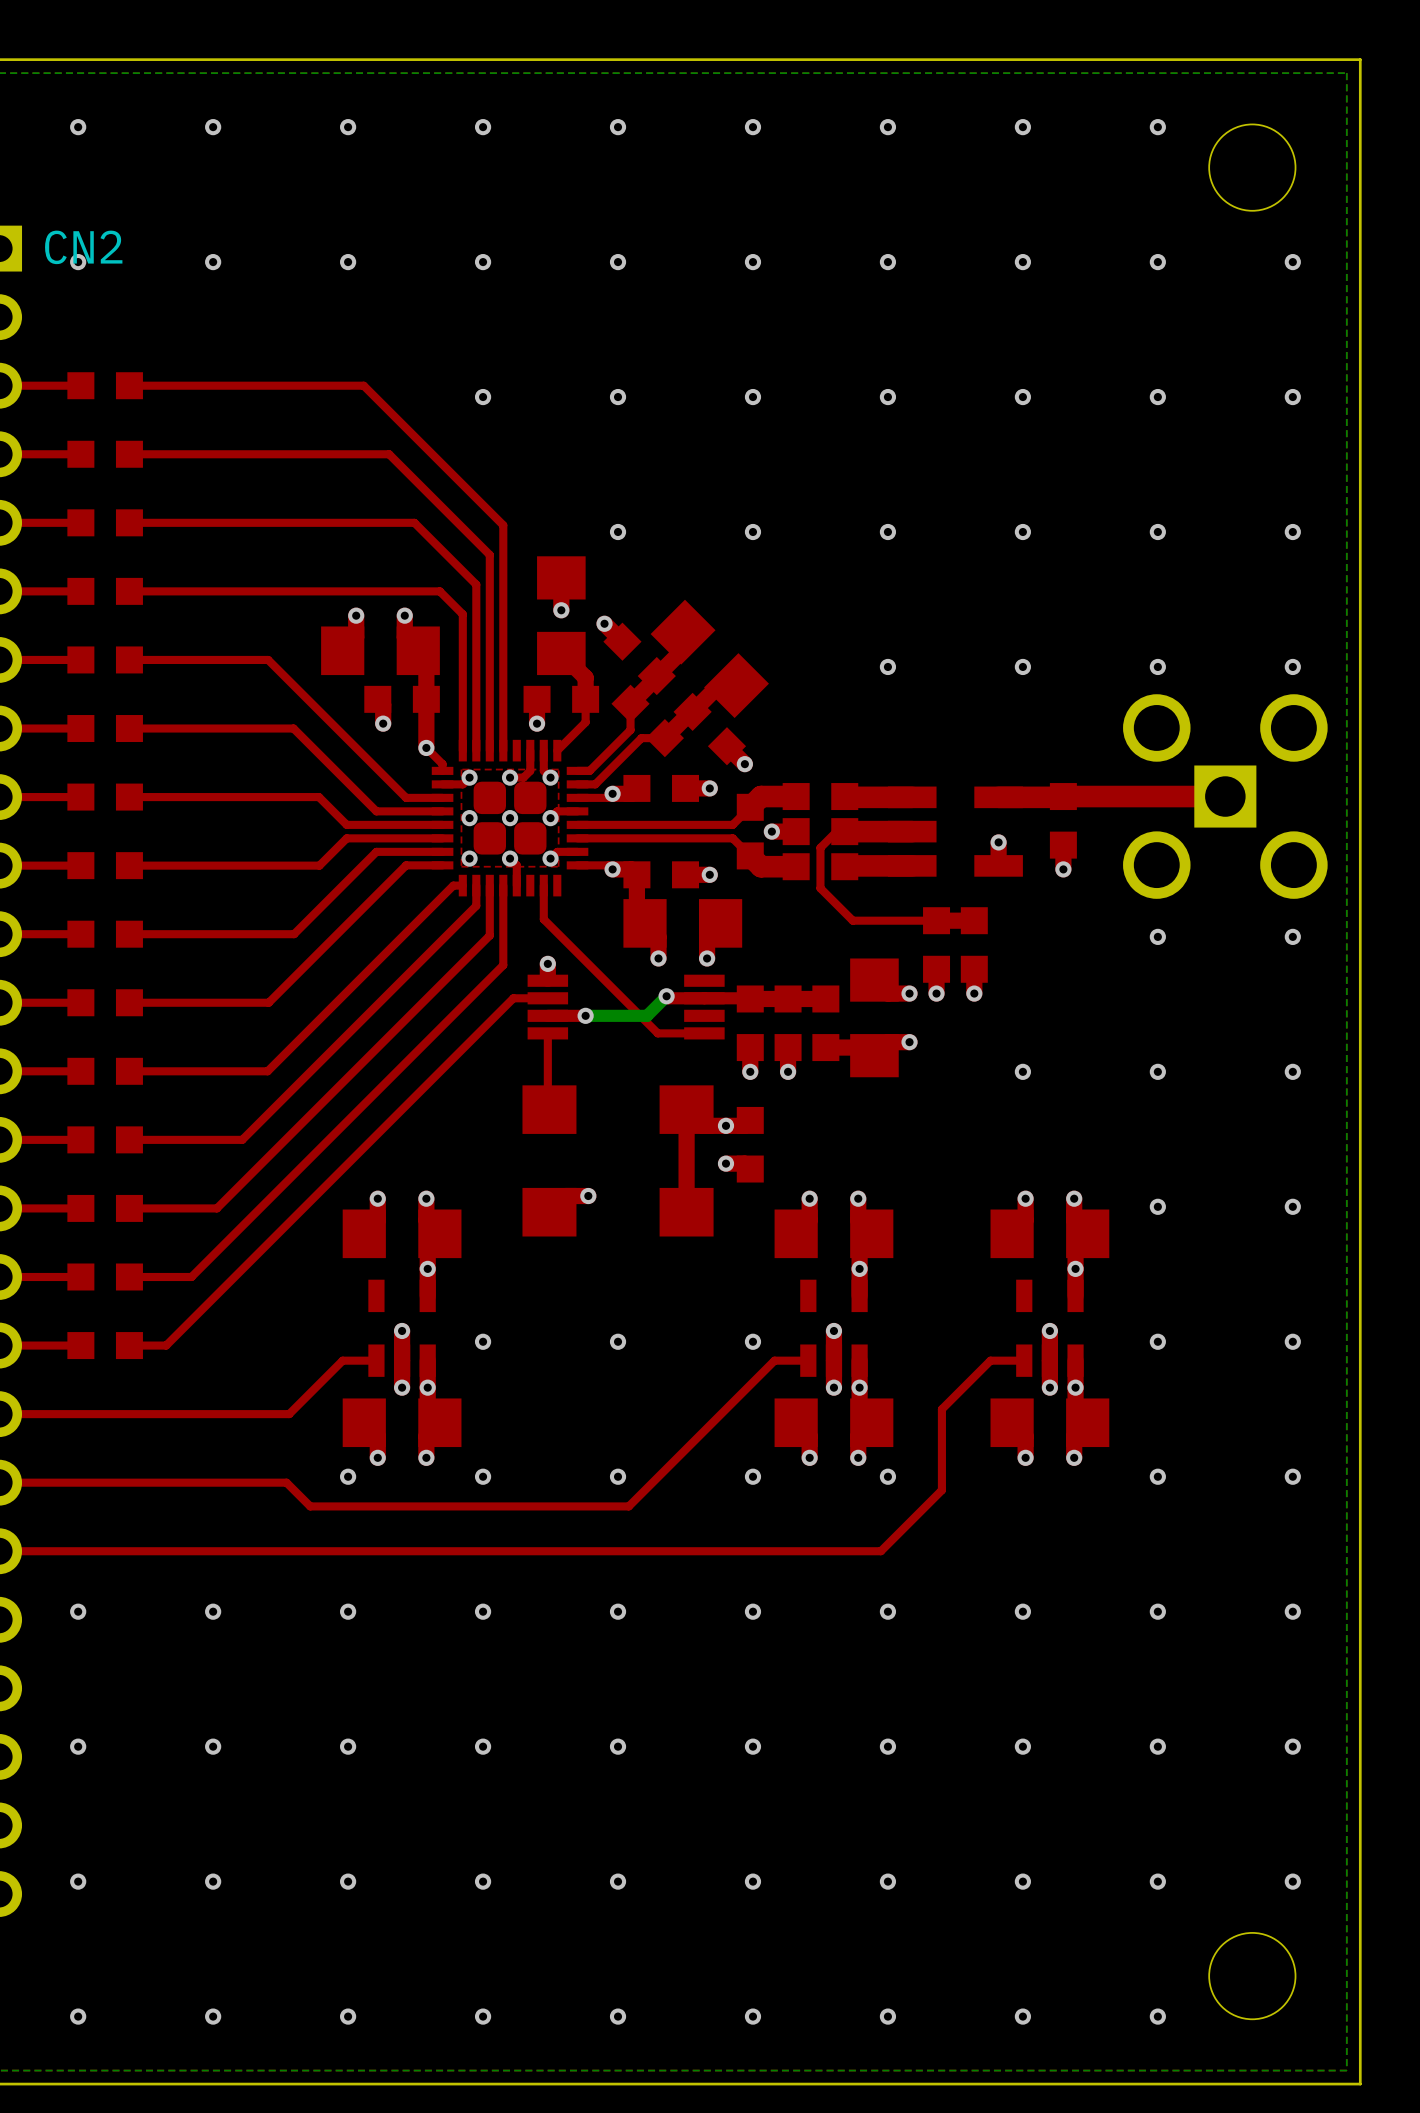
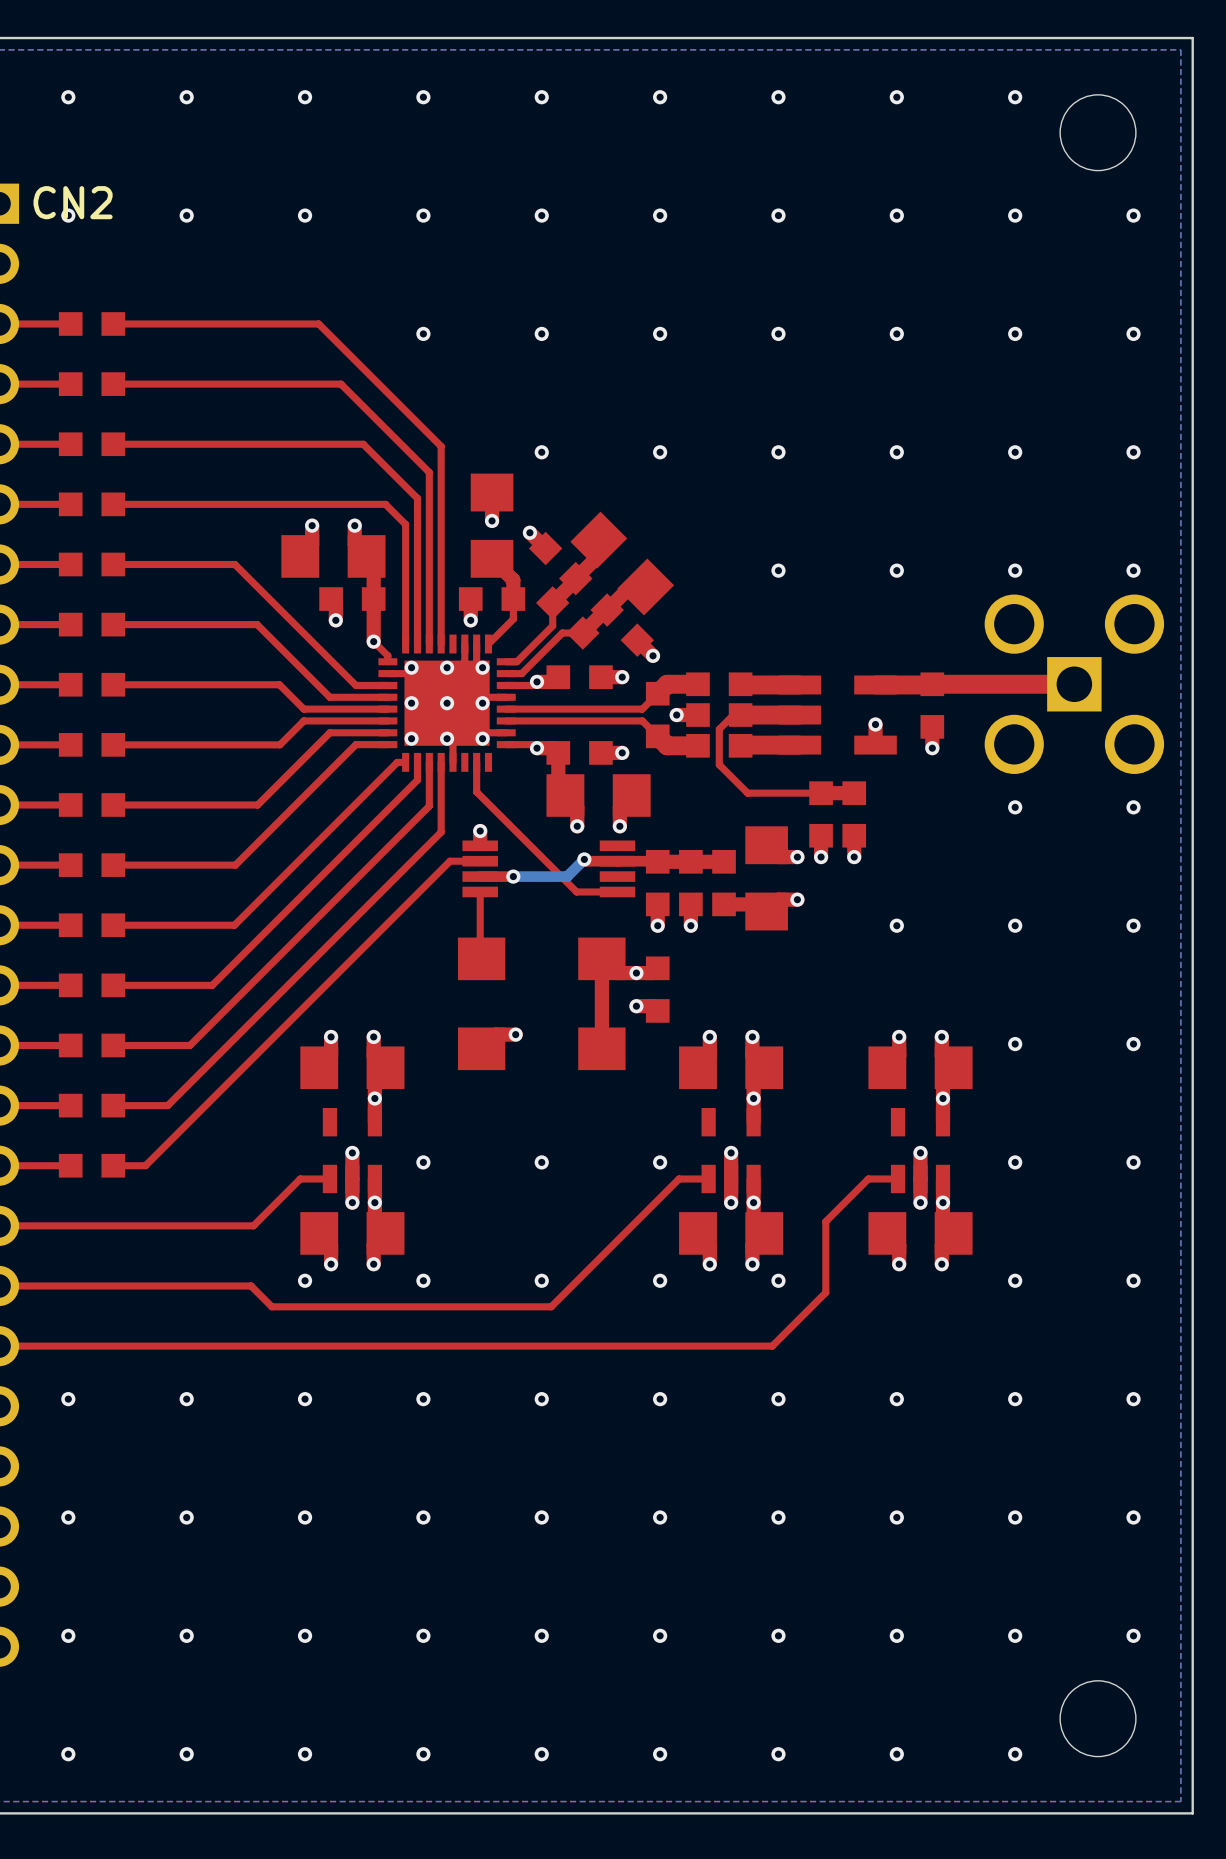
part footprint: [431, 739, 589, 897] -> [378, 634, 516, 772]
top zone outline: (558, 769) (461, 769) (461, 866) (558, 866) (558, 769) -> none

